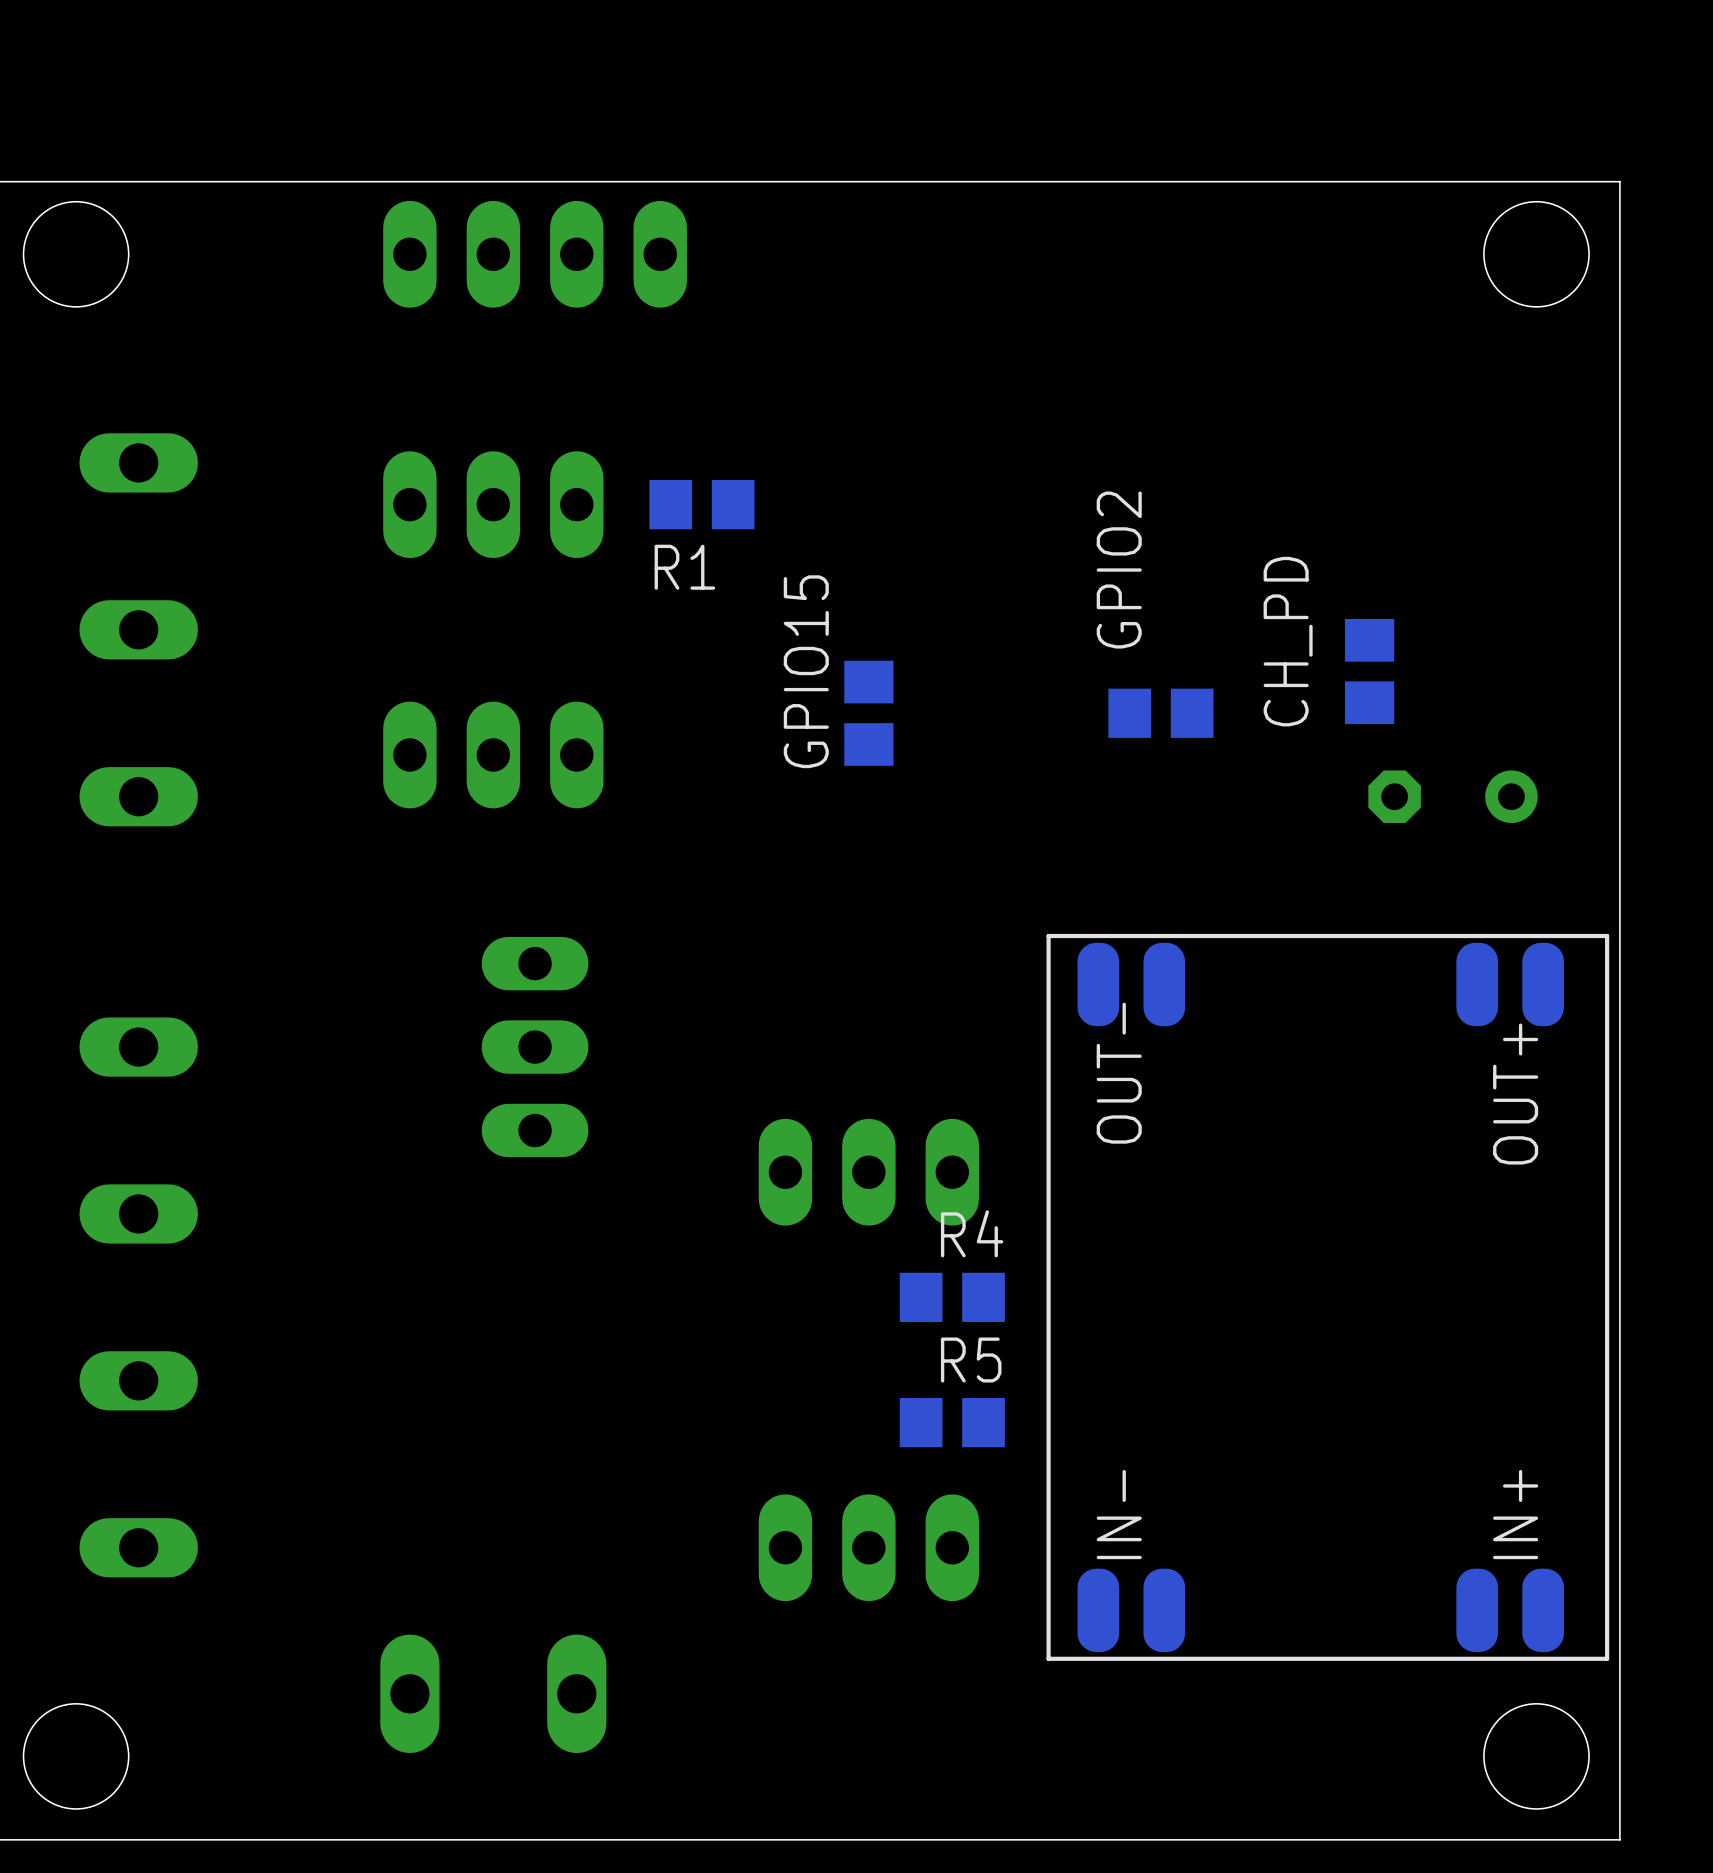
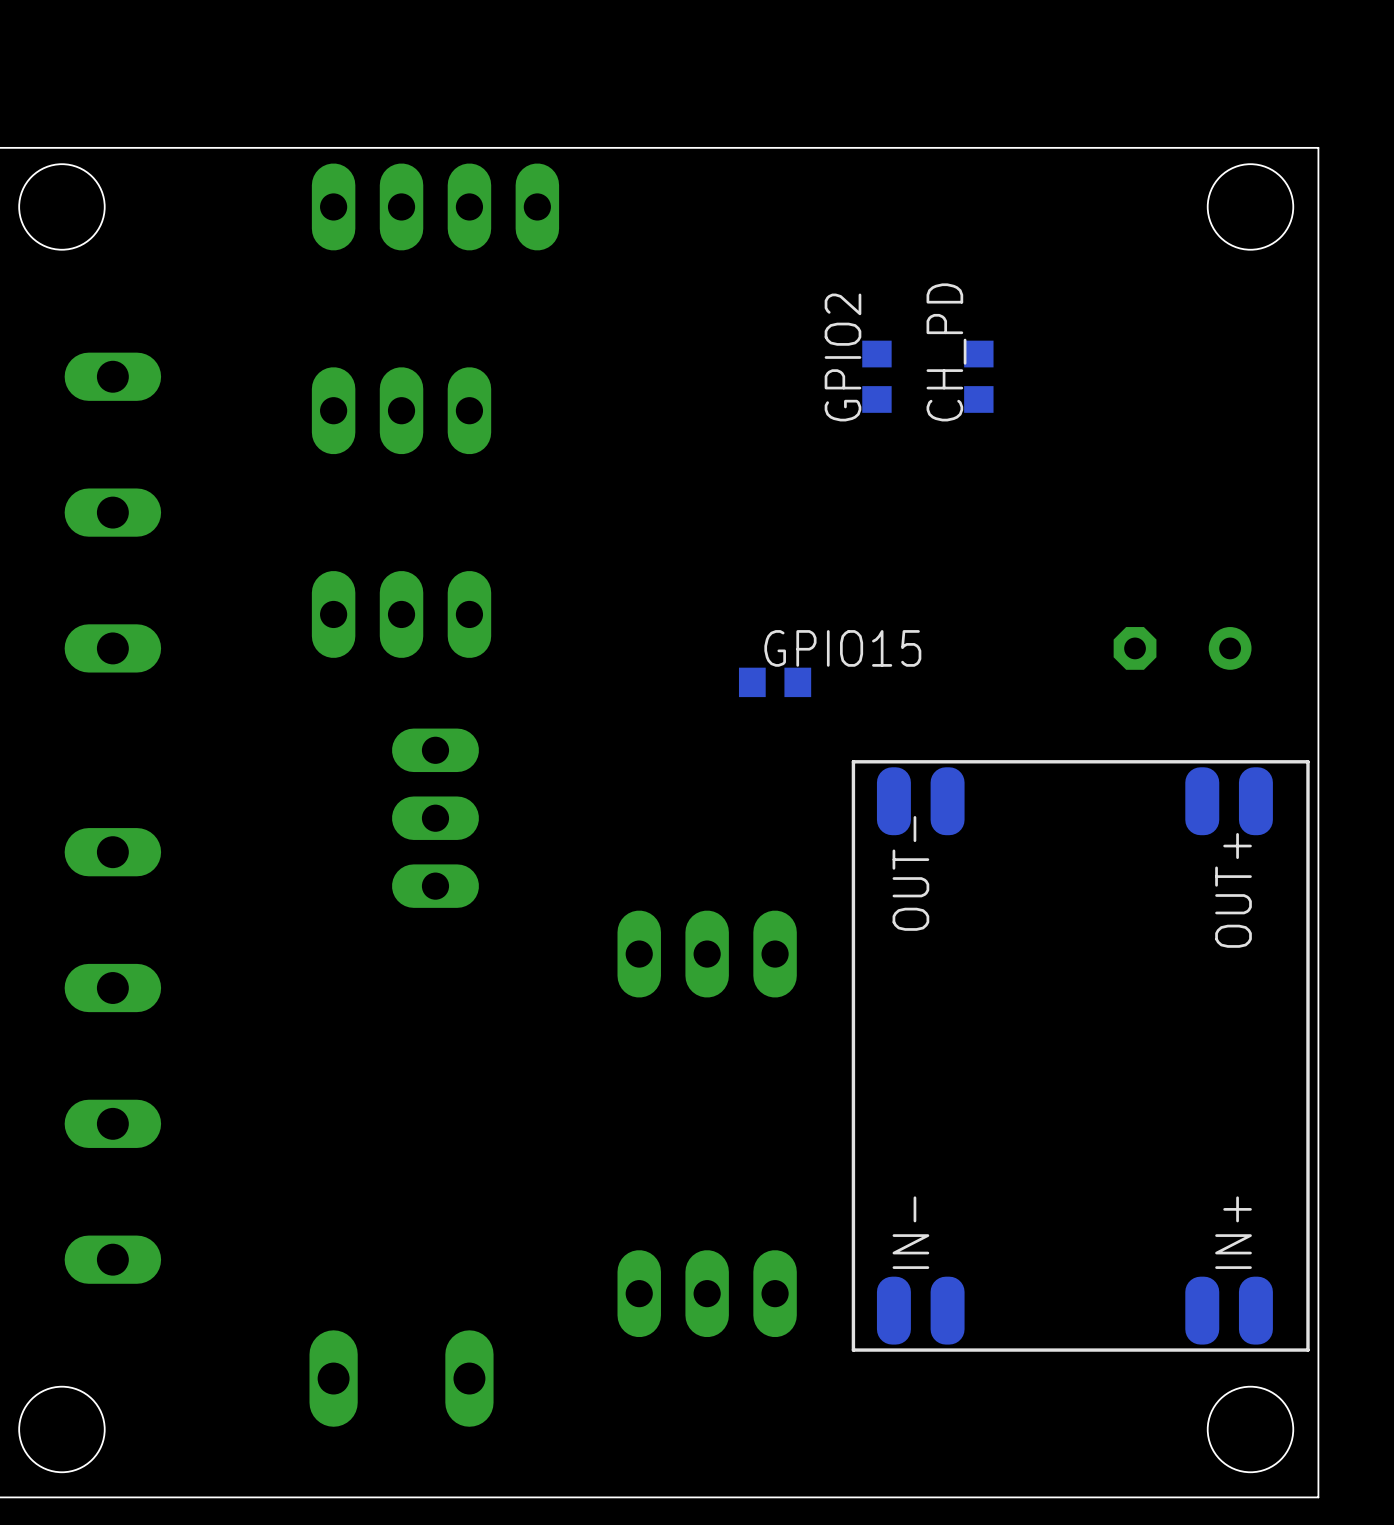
CH_PD: none -> (978, 376)
R1: (701, 504) -> none
GPIO2 name position: GPIO2 (1119, 570) -> GPIO2 (842, 357)
GPIO15 footprint: [844, 660, 894, 766] -> [738, 667, 812, 698]
GPIO15 name position: GPIO15 (806, 671) -> GPIO15 (842, 648)
CH_PD: (1369, 671) -> none
GPIO2 footprint: [1108, 688, 1214, 738] -> [862, 340, 892, 413]
part position: (535, 1047) -> (435, 818)
R4: (952, 1297) -> none
R5: (952, 1422) -> none
part position: (868, 1547) -> (707, 1293)

